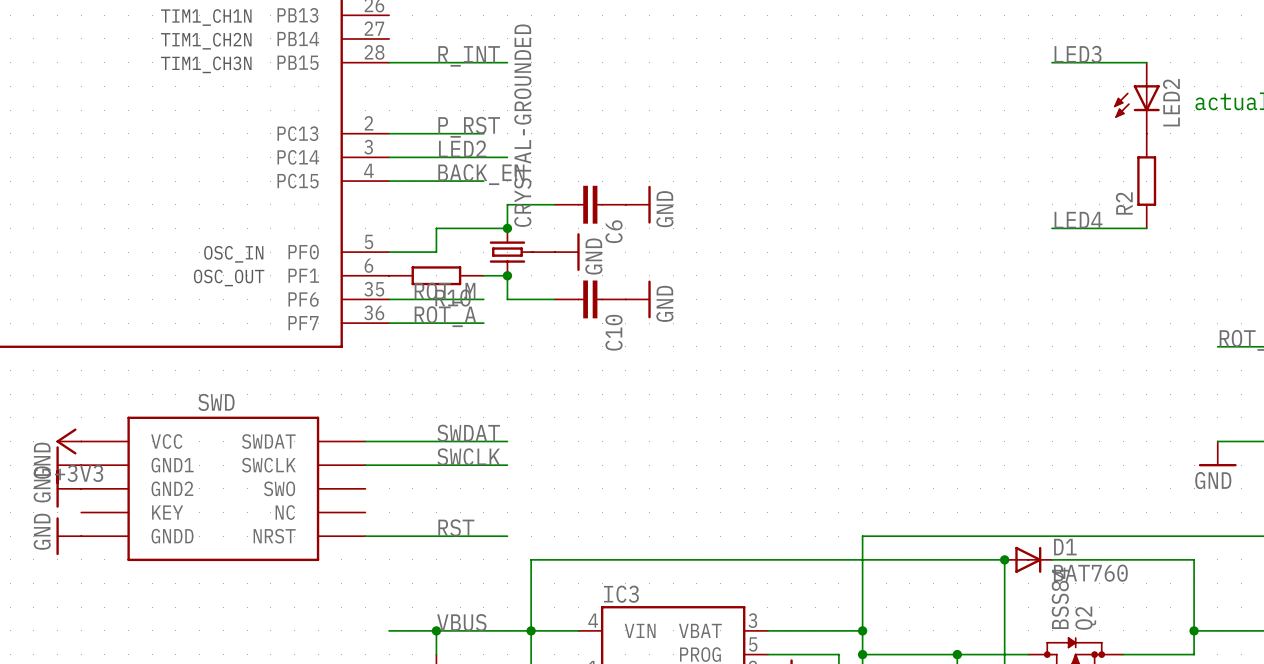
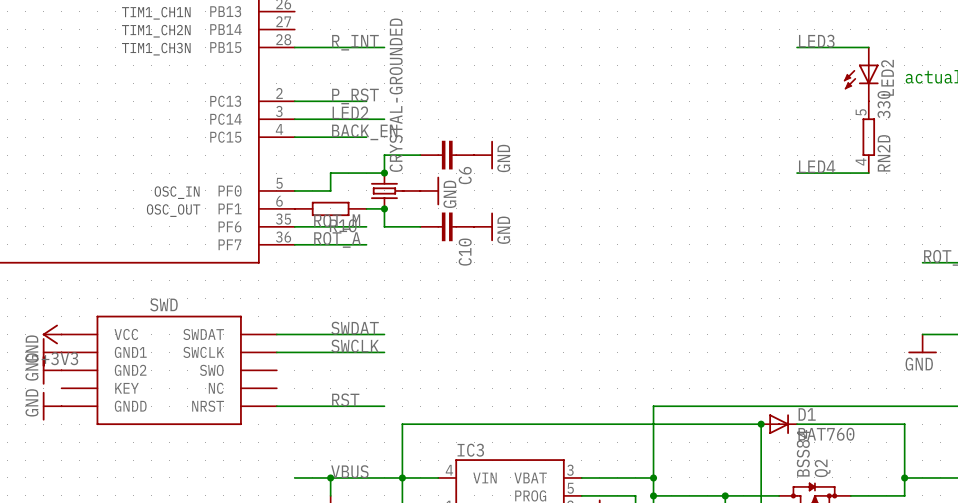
R2: (1146, 181) -> none
RN2D: none -> 330 (868, 137)

